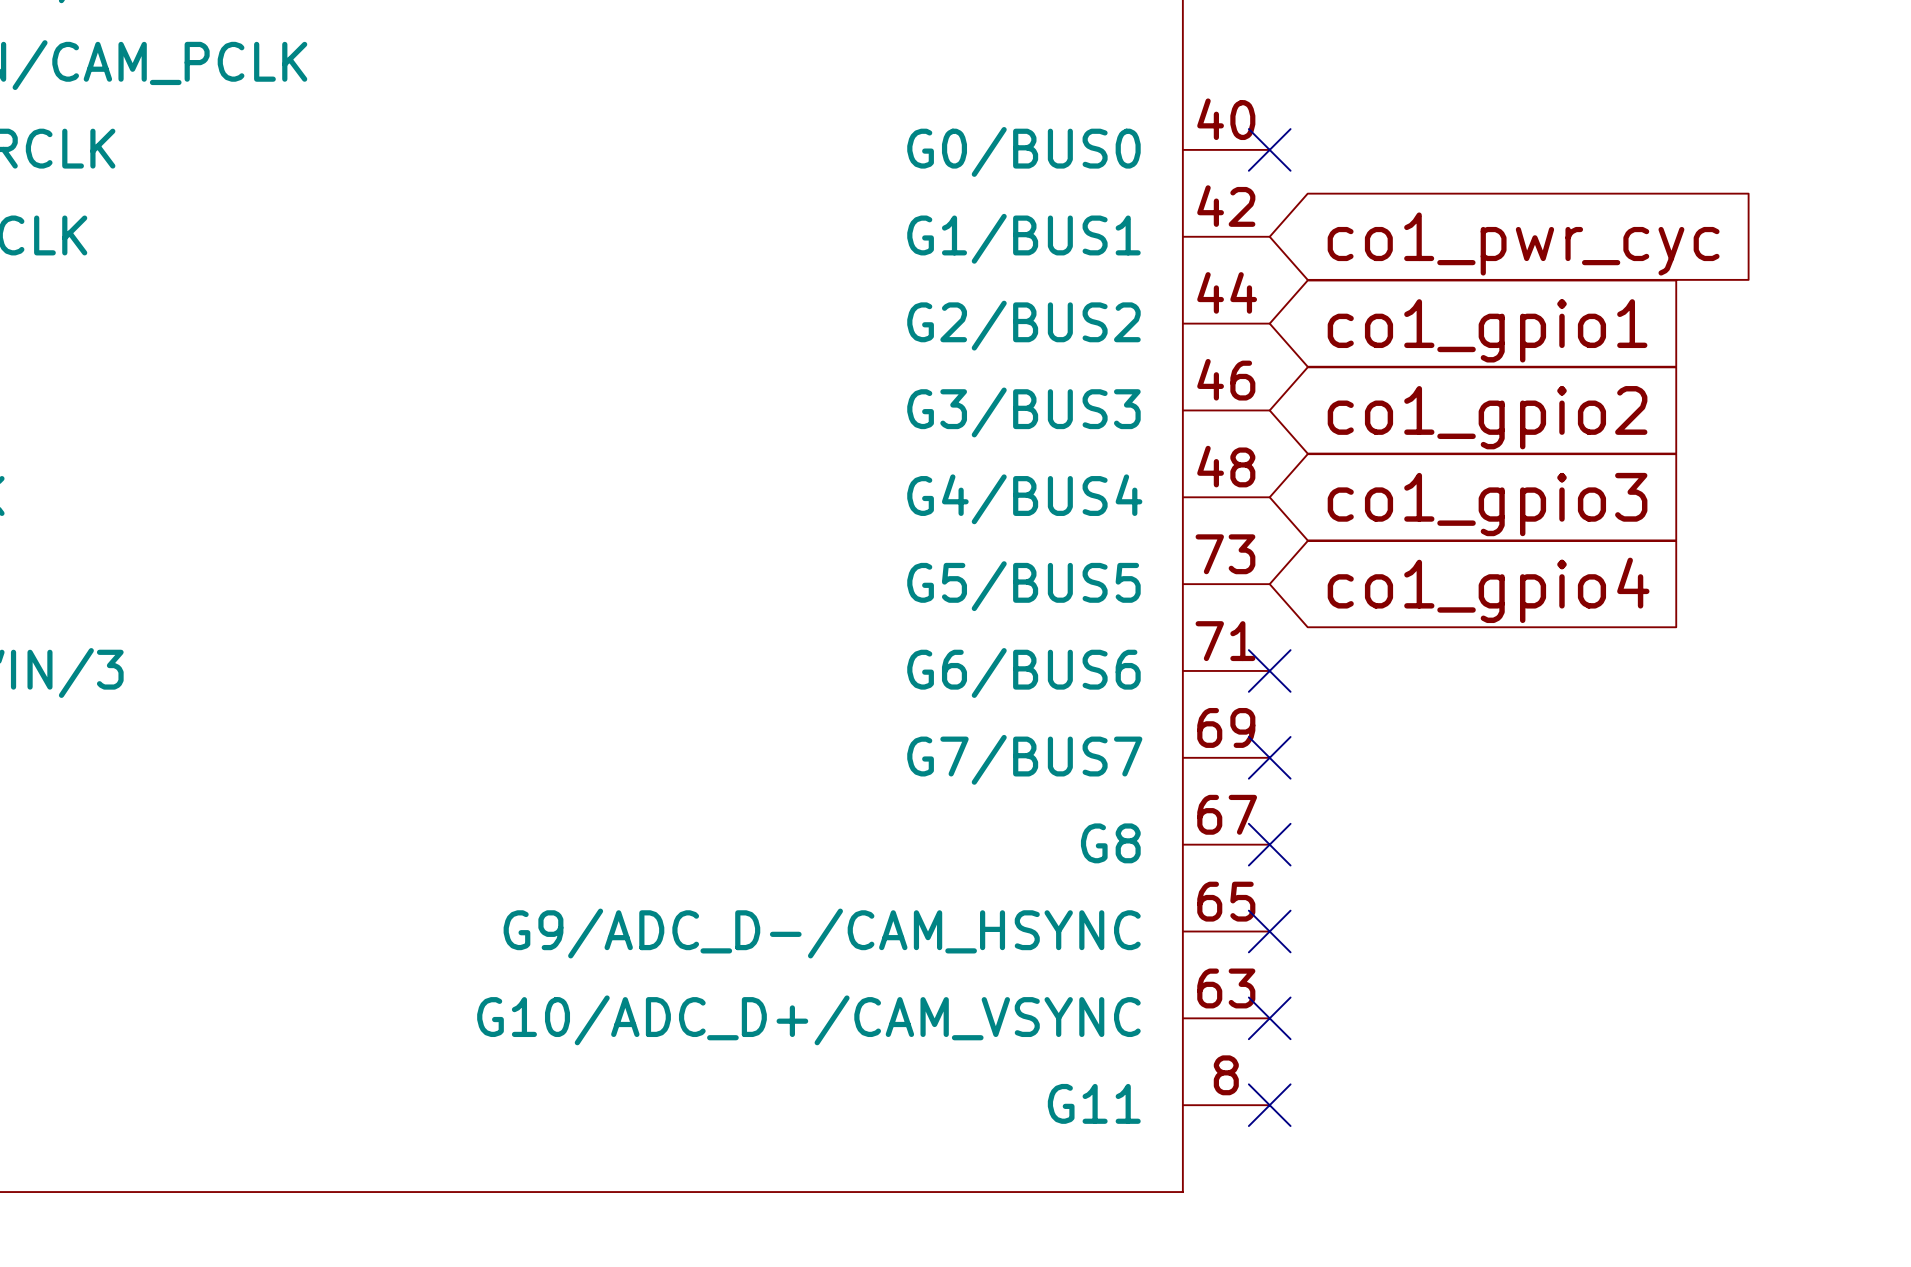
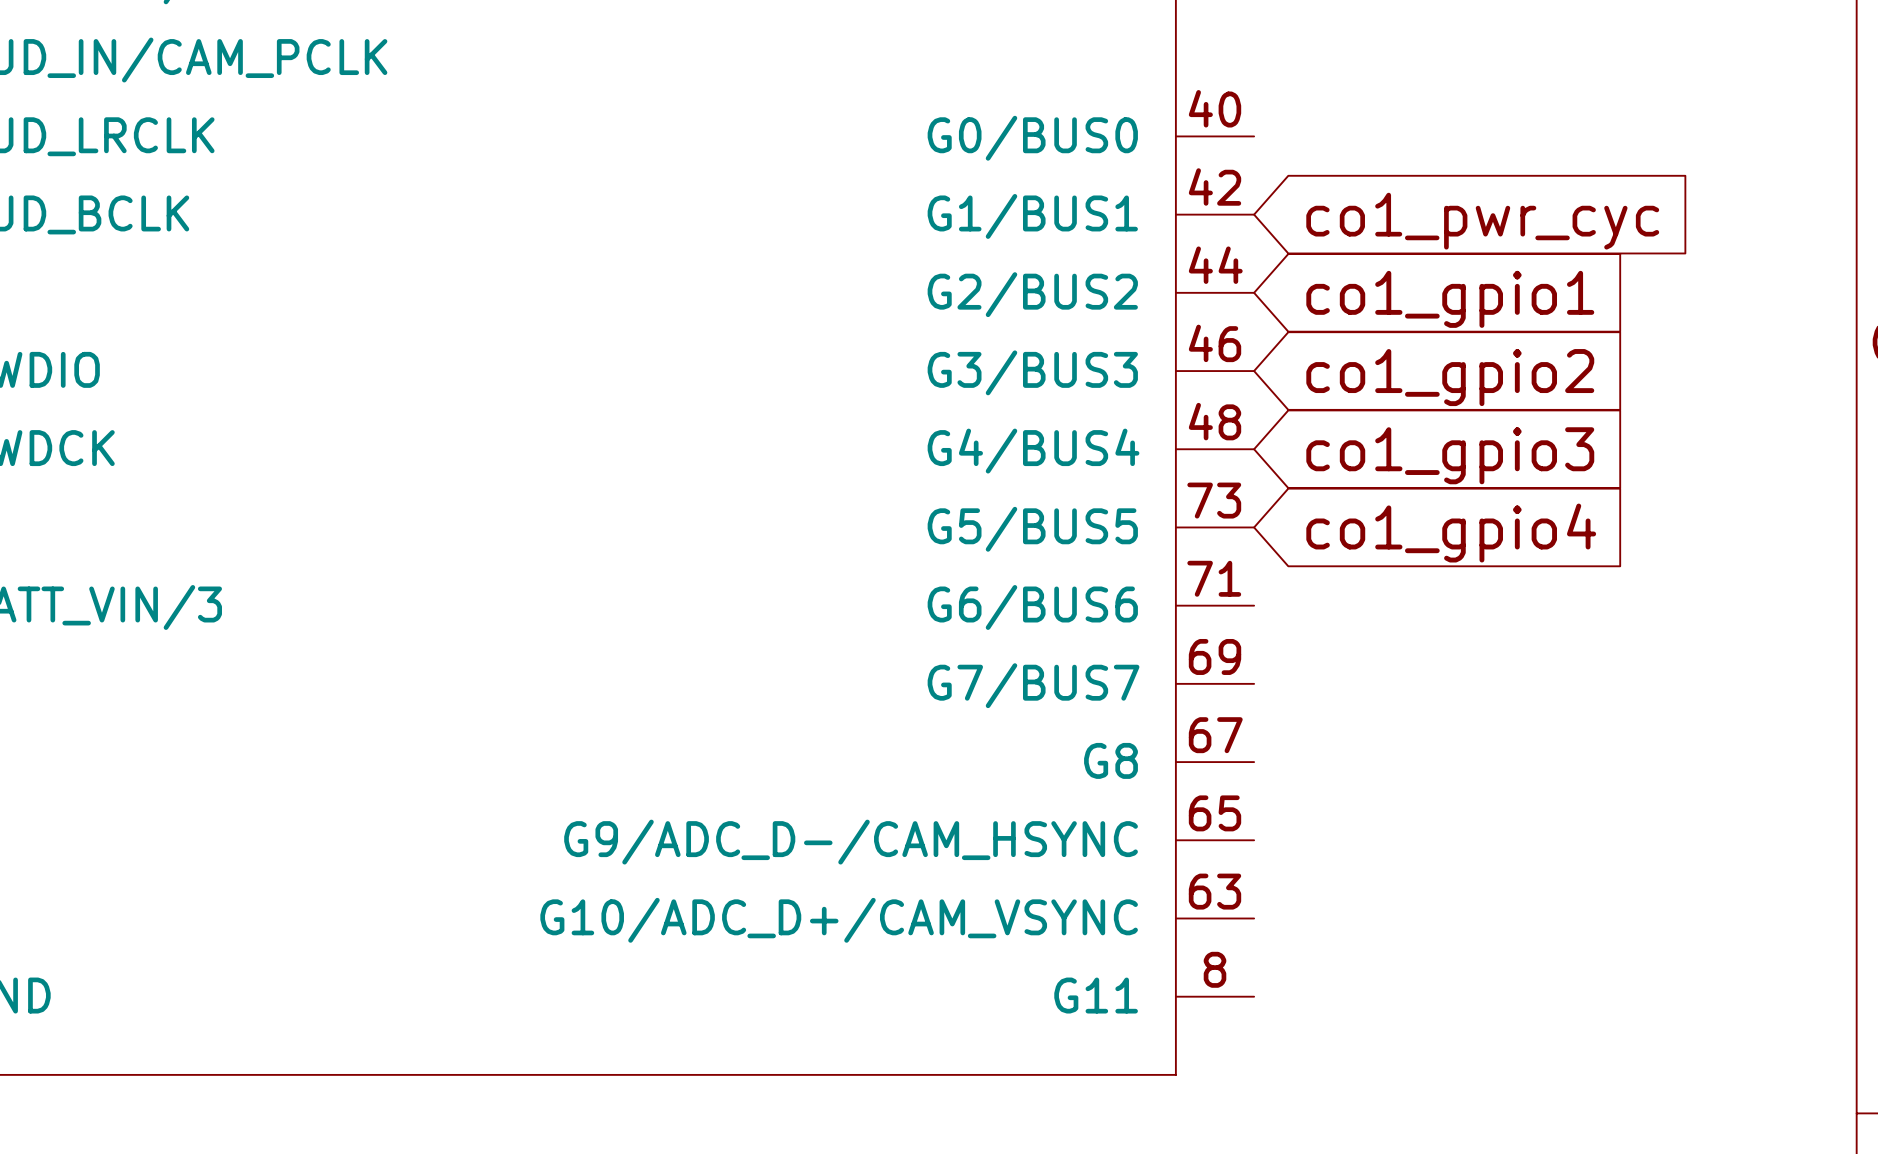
no-connect mark: (1269, 149) -> none
no-connect mark: (1269, 670) -> none
no-connect mark: (1269, 757) -> none
no-connect mark: (1269, 844) -> none
no-connect mark: (1269, 931) -> none
no-connect mark: (1269, 1018) -> none
no-connect mark: (1269, 1105) -> none

